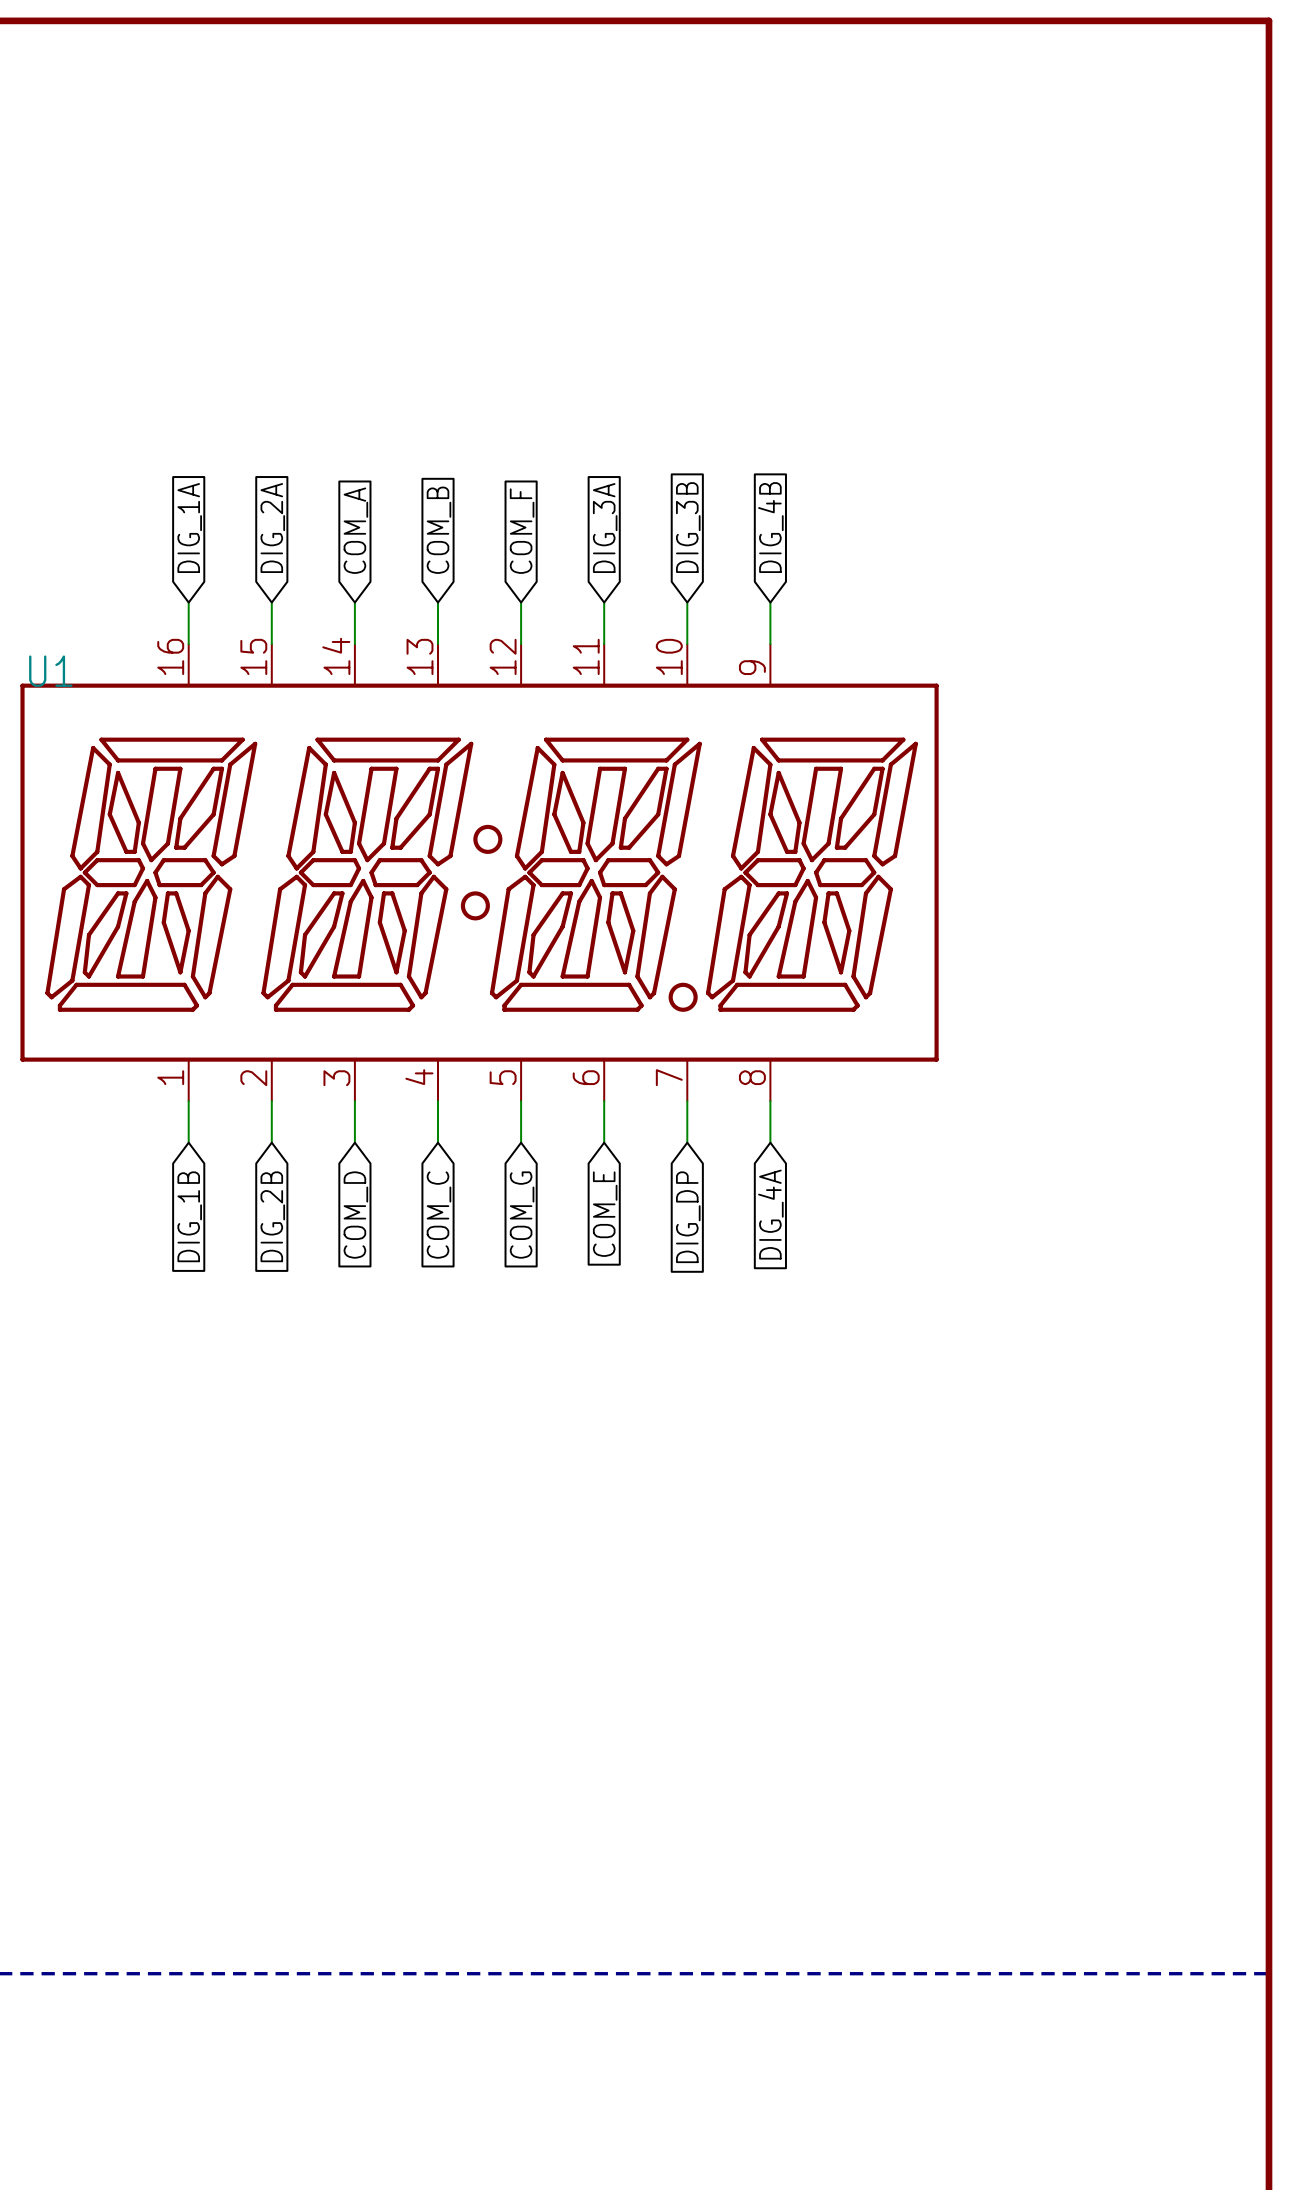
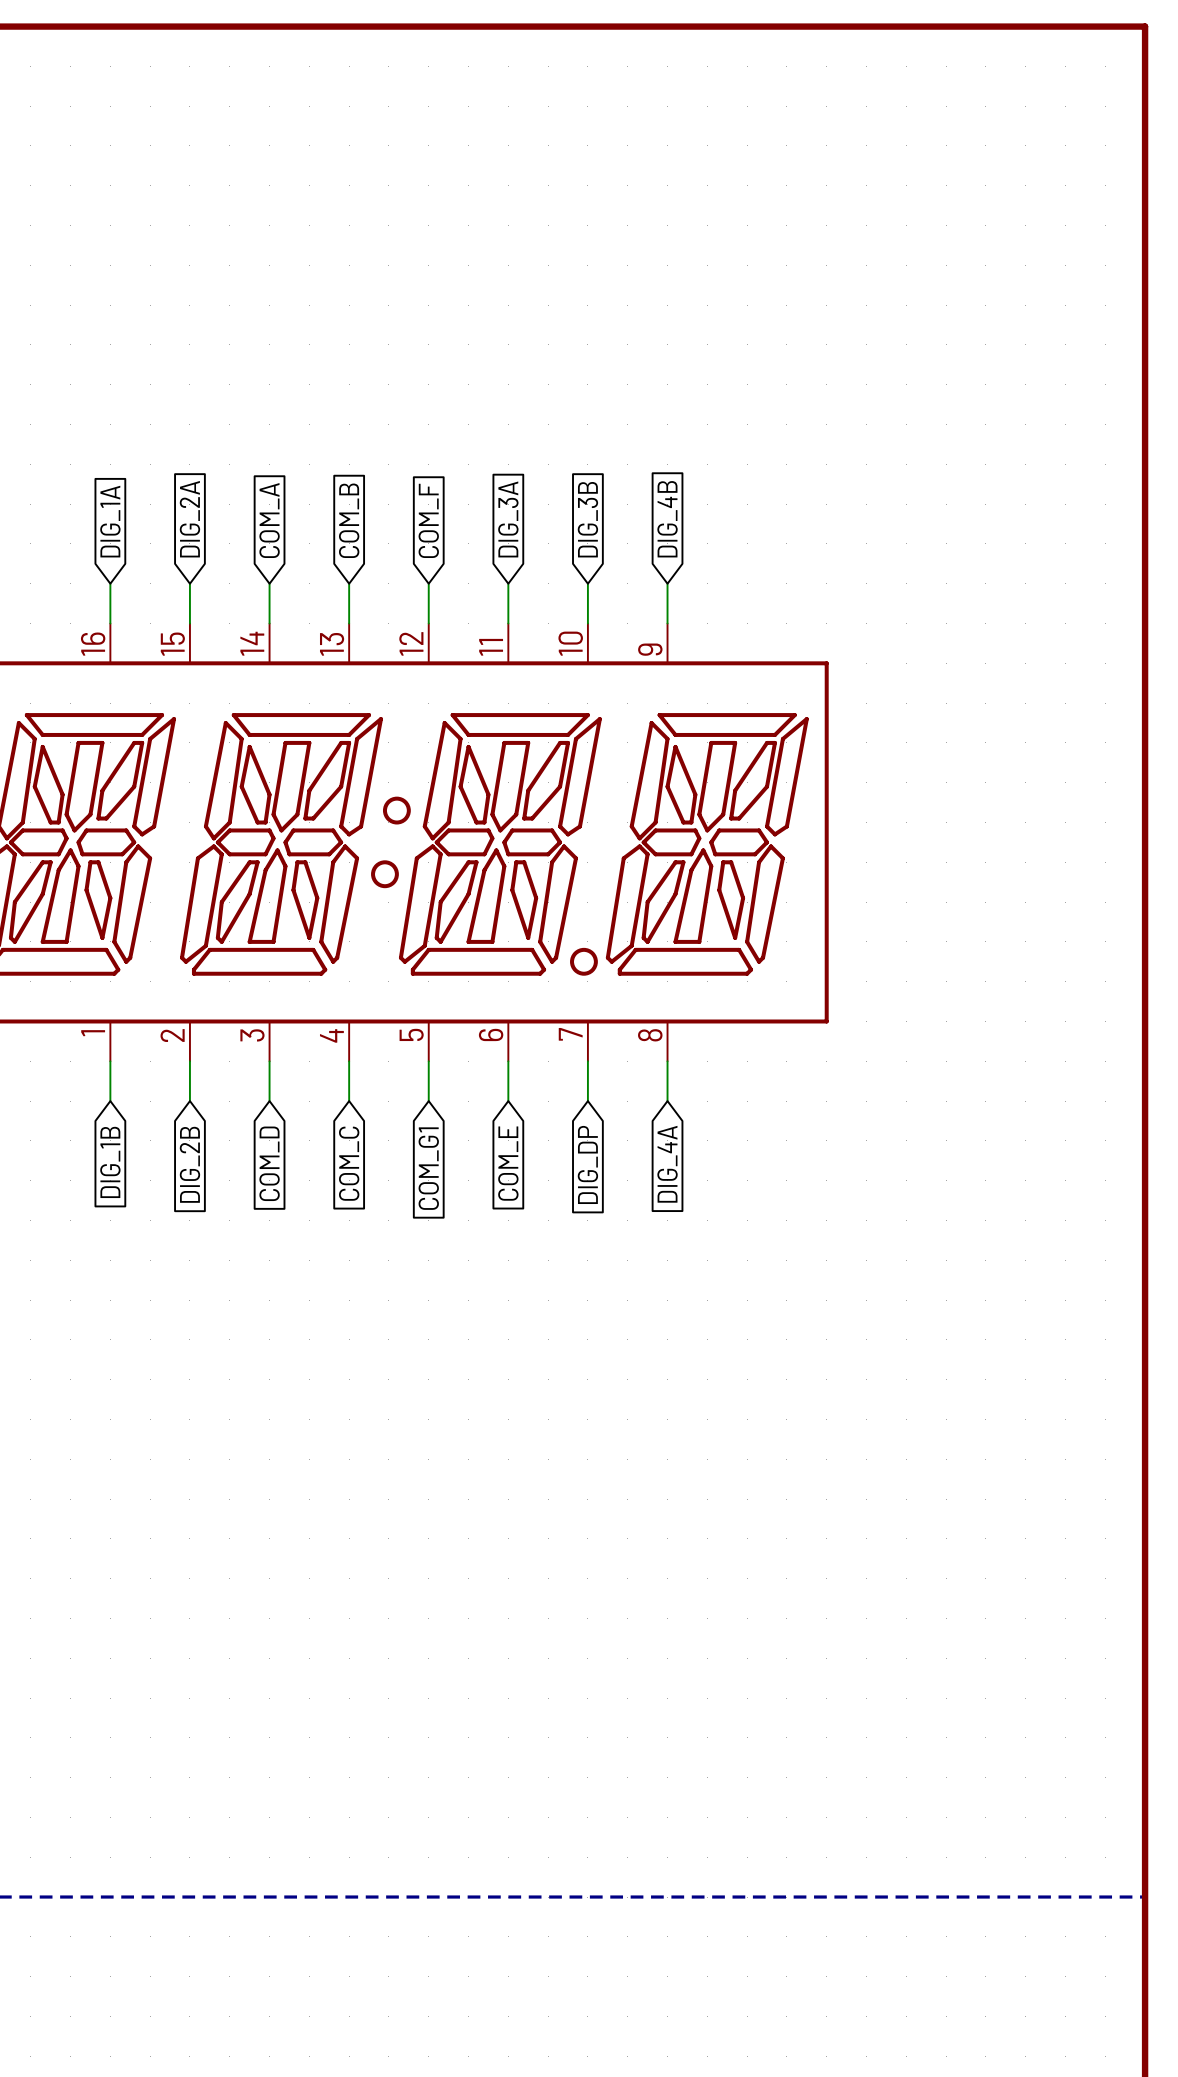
global label: COM_G (522, 1215) -> COM_G1 (428, 1168)

